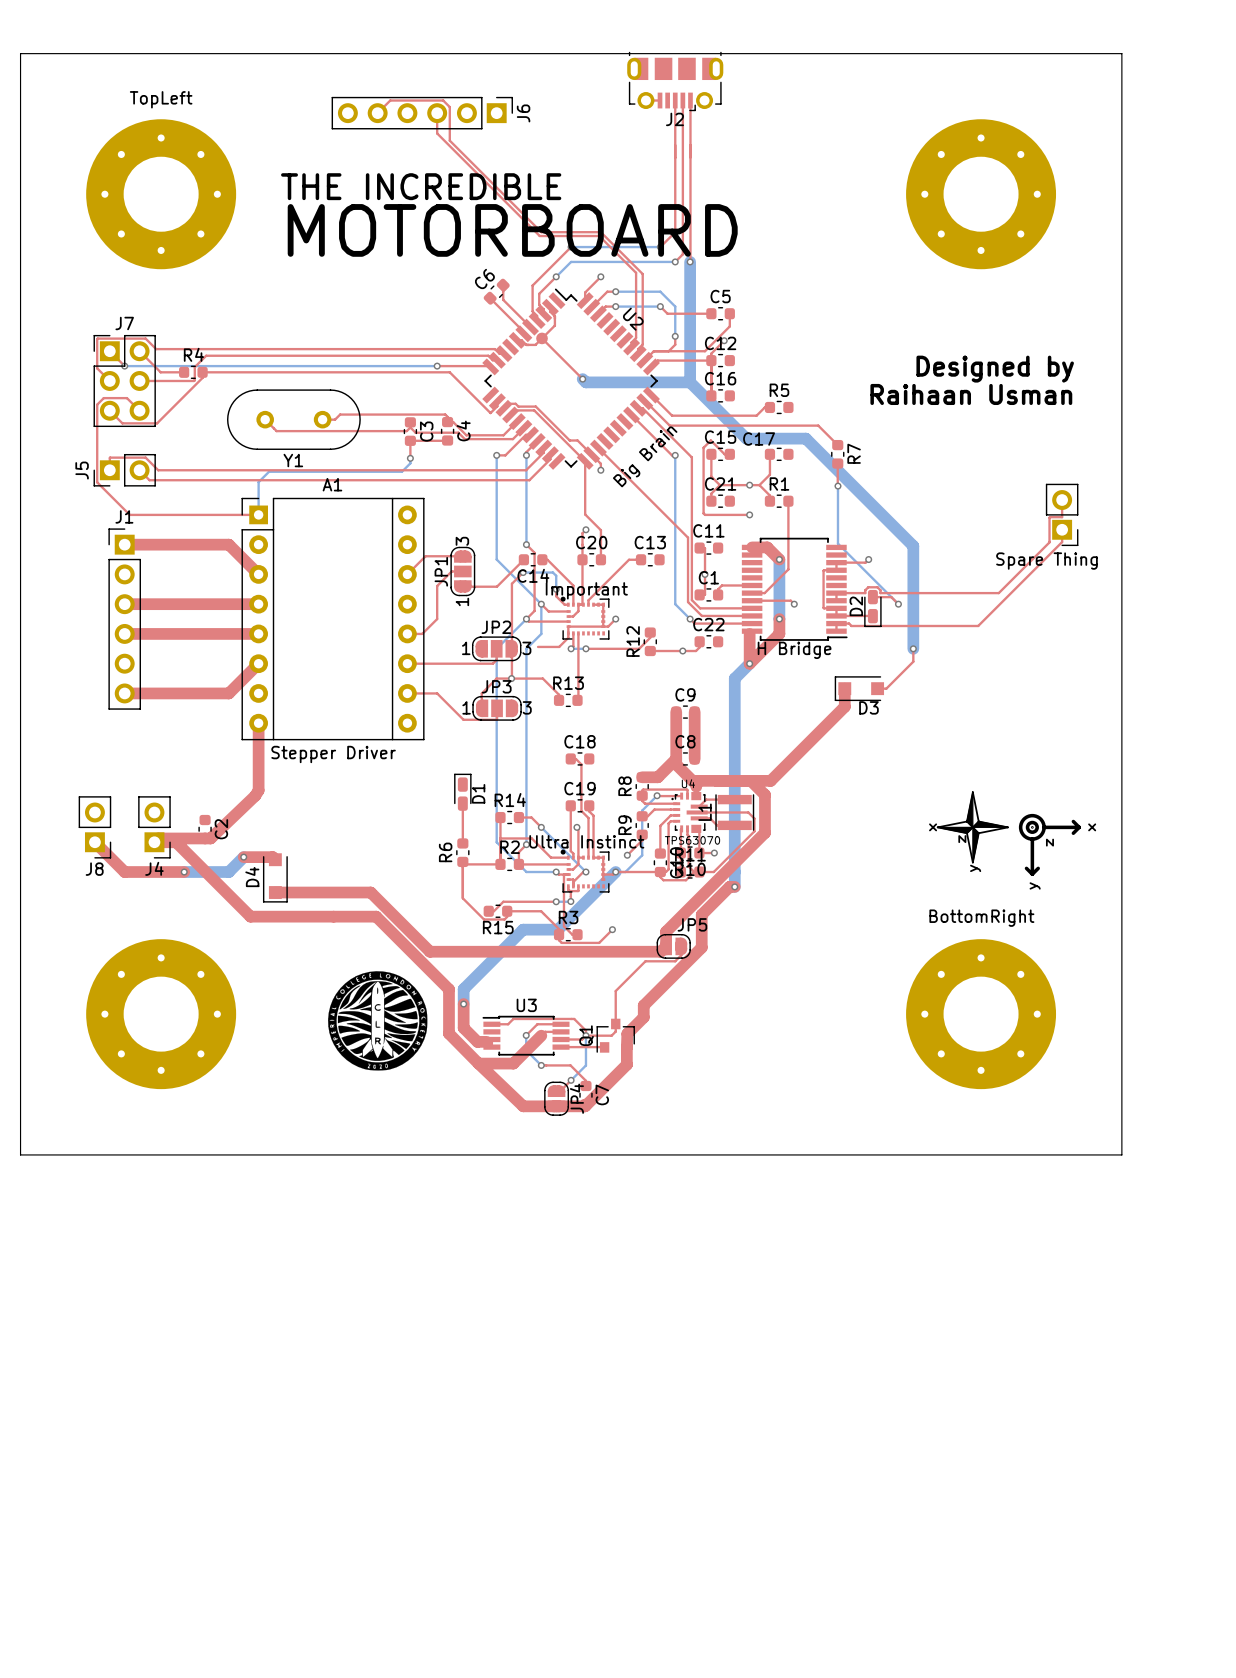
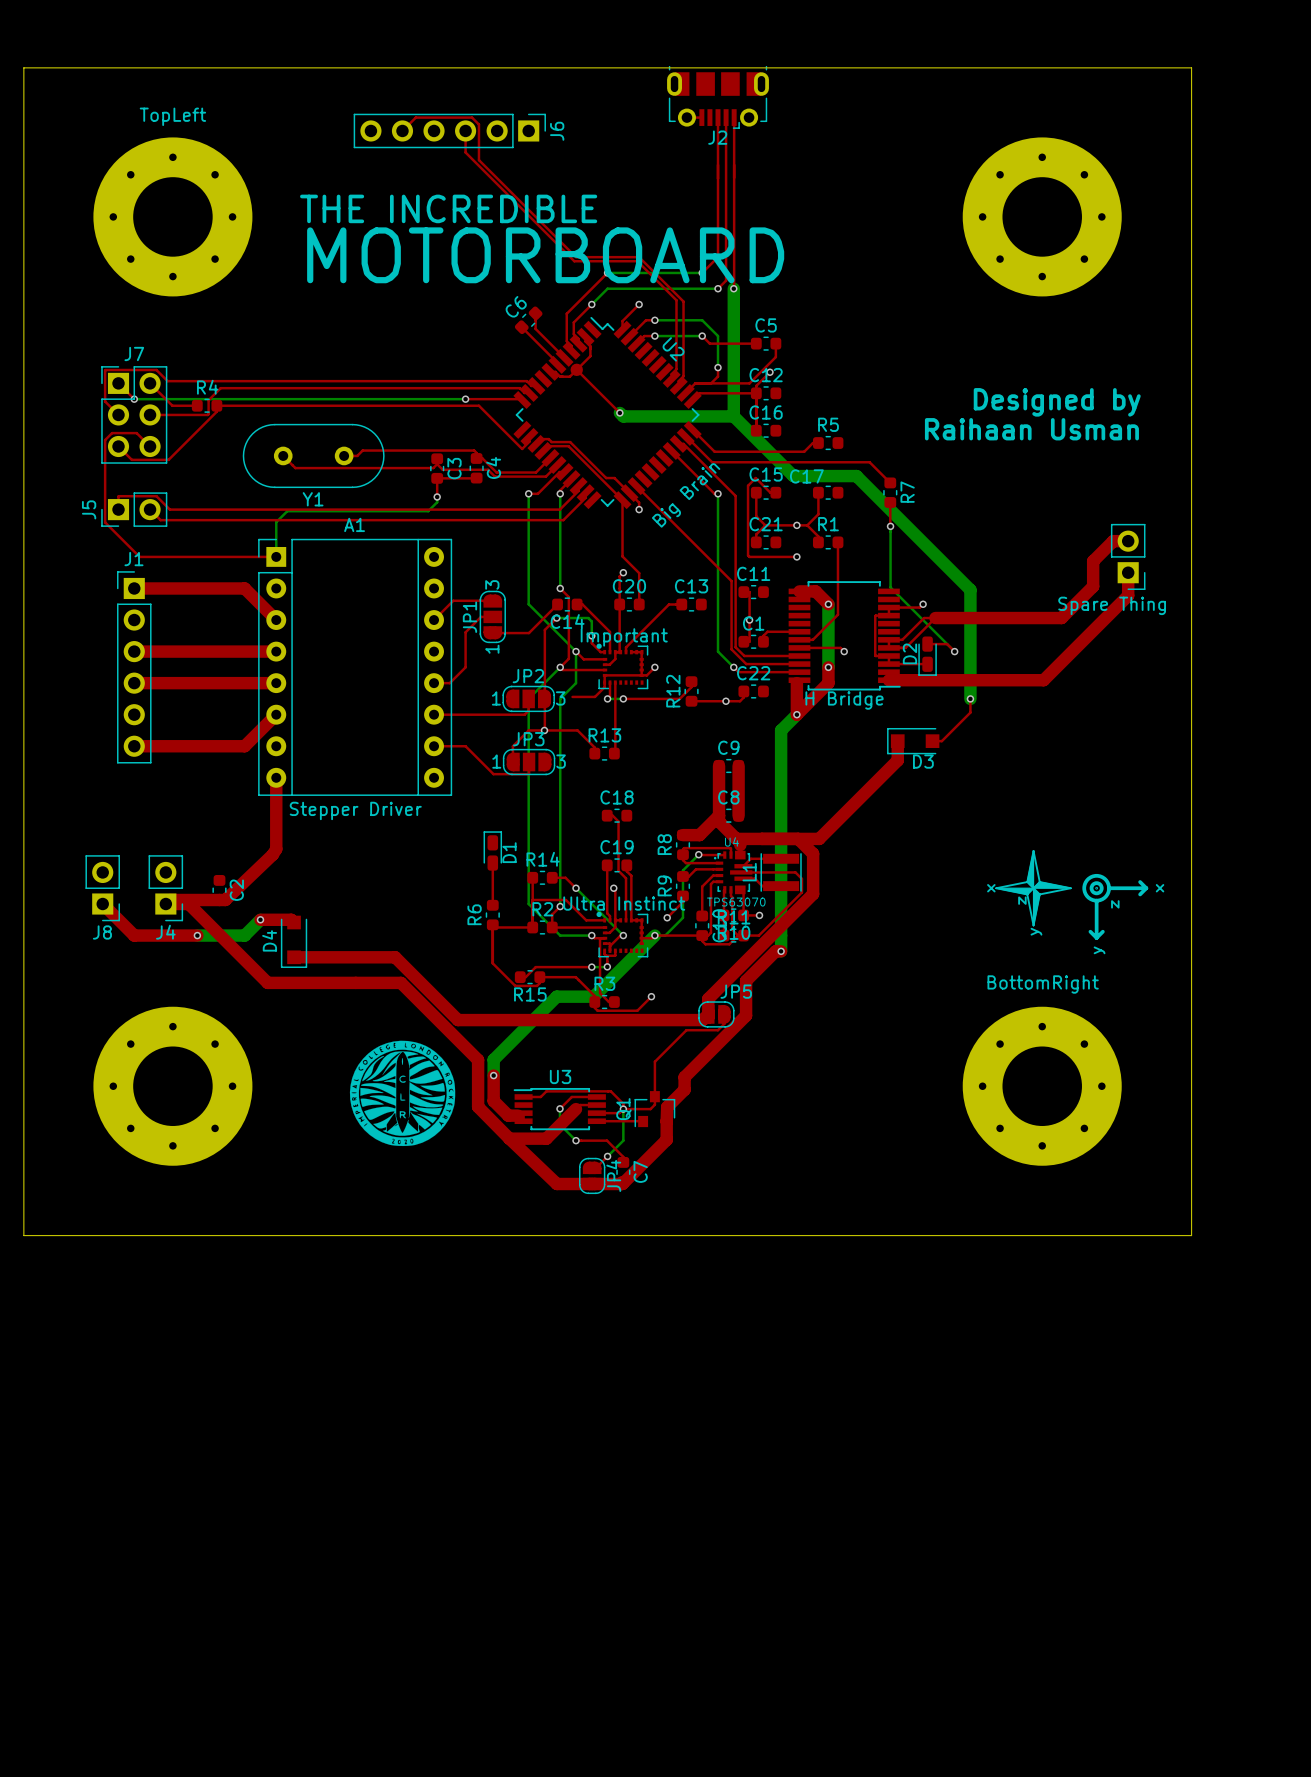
top track: (1062, 500) (1062, 517) (1049, 517) (1049, 542) (998, 593) (880, 593) (877, 587) (868, 587) (865, 593) (849, 593) -> (1128, 541) (1113, 541) (1093, 561) (1093, 586) (1061, 618) (935, 618)
top track: none -> (1128, 572) (1128, 595) (1043, 680) (888, 680)
top track: (1062, 542) (978, 625) (851, 625) (849, 623) (836, 623) -> none
top track: none -> (935, 618) (924, 618) (902, 639)
top track: none -> (935, 618) (905, 647) (888, 647)

